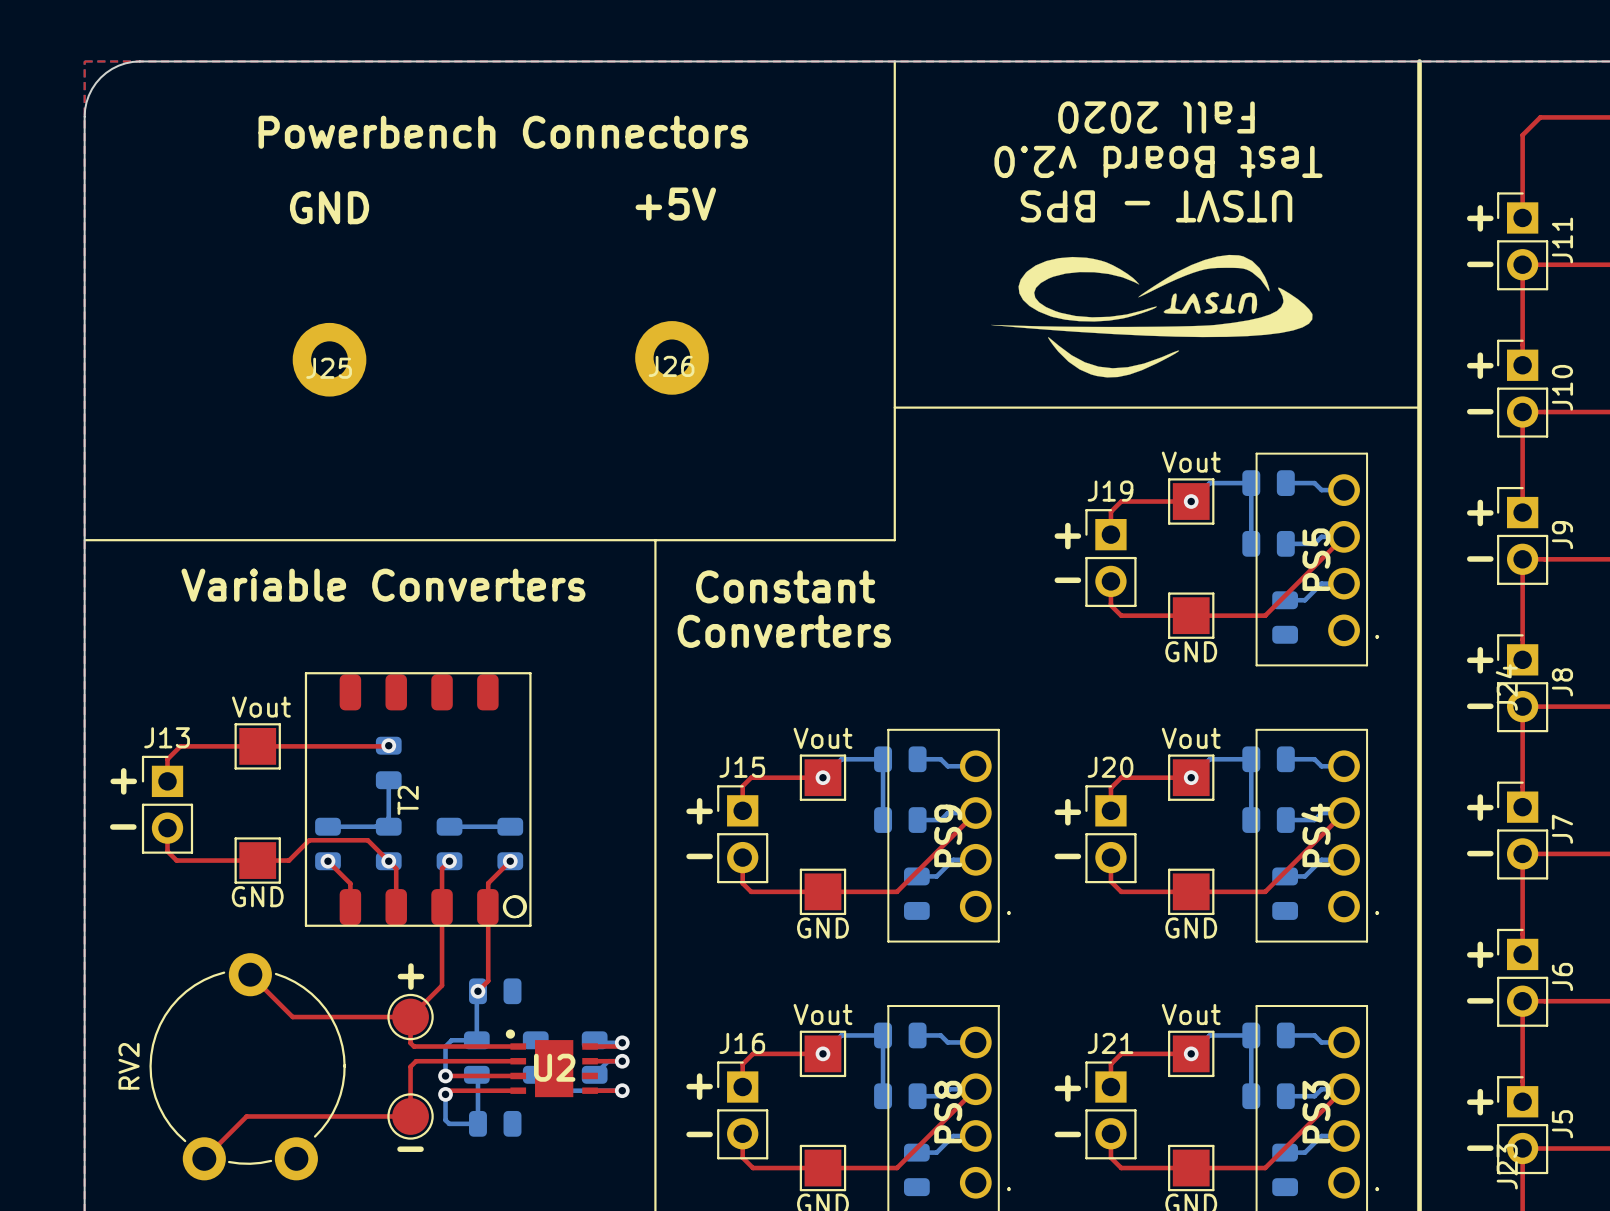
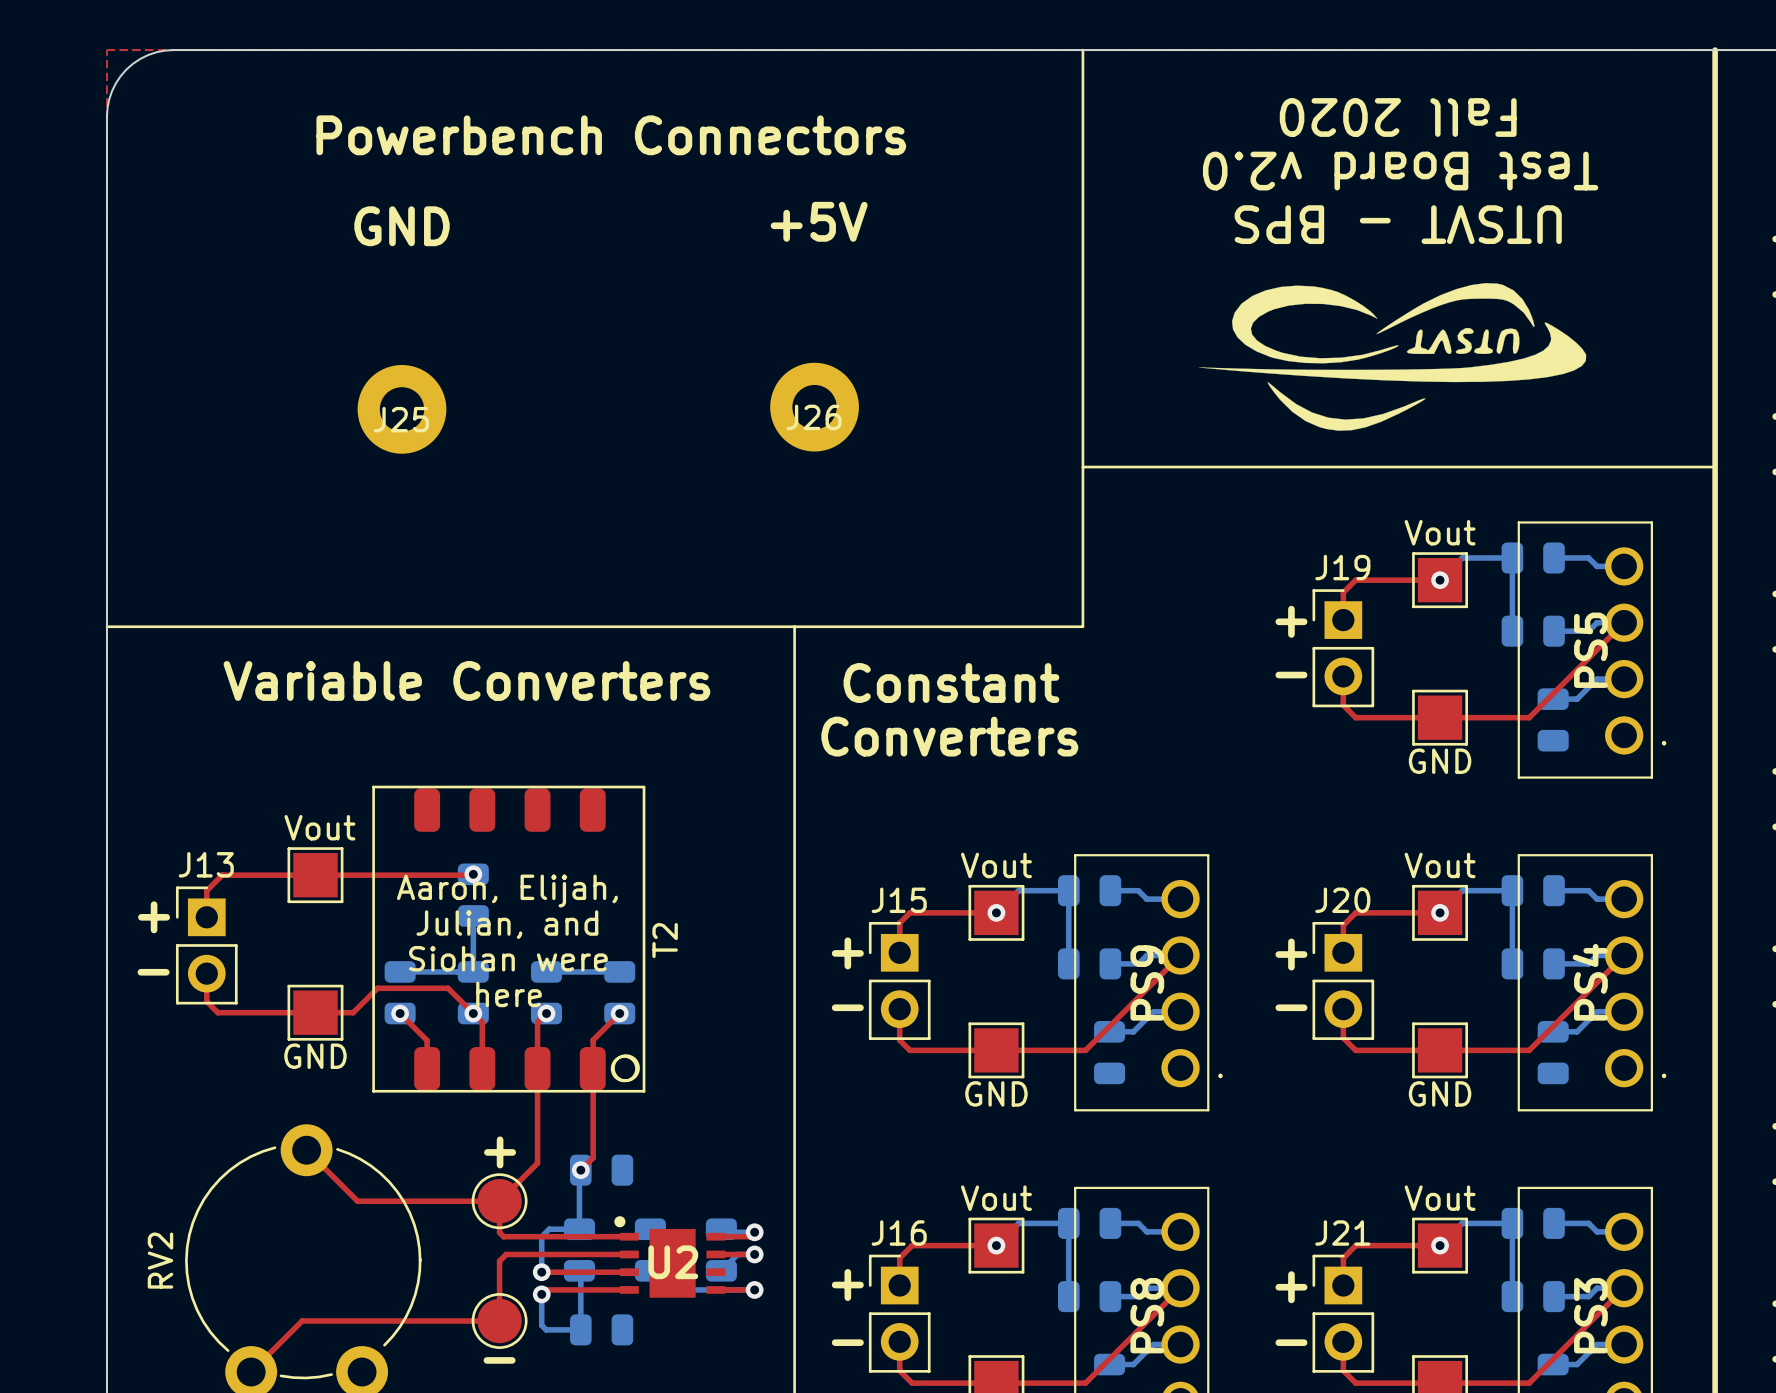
text: none -> Aaron, Elijah, (507, 891)
text: none -> Julian, and (507, 924)
T2 name position: T2 (408, 800) -> T2 (665, 940)
text: none -> Siohan were (508, 958)
text: none -> here (508, 994)

